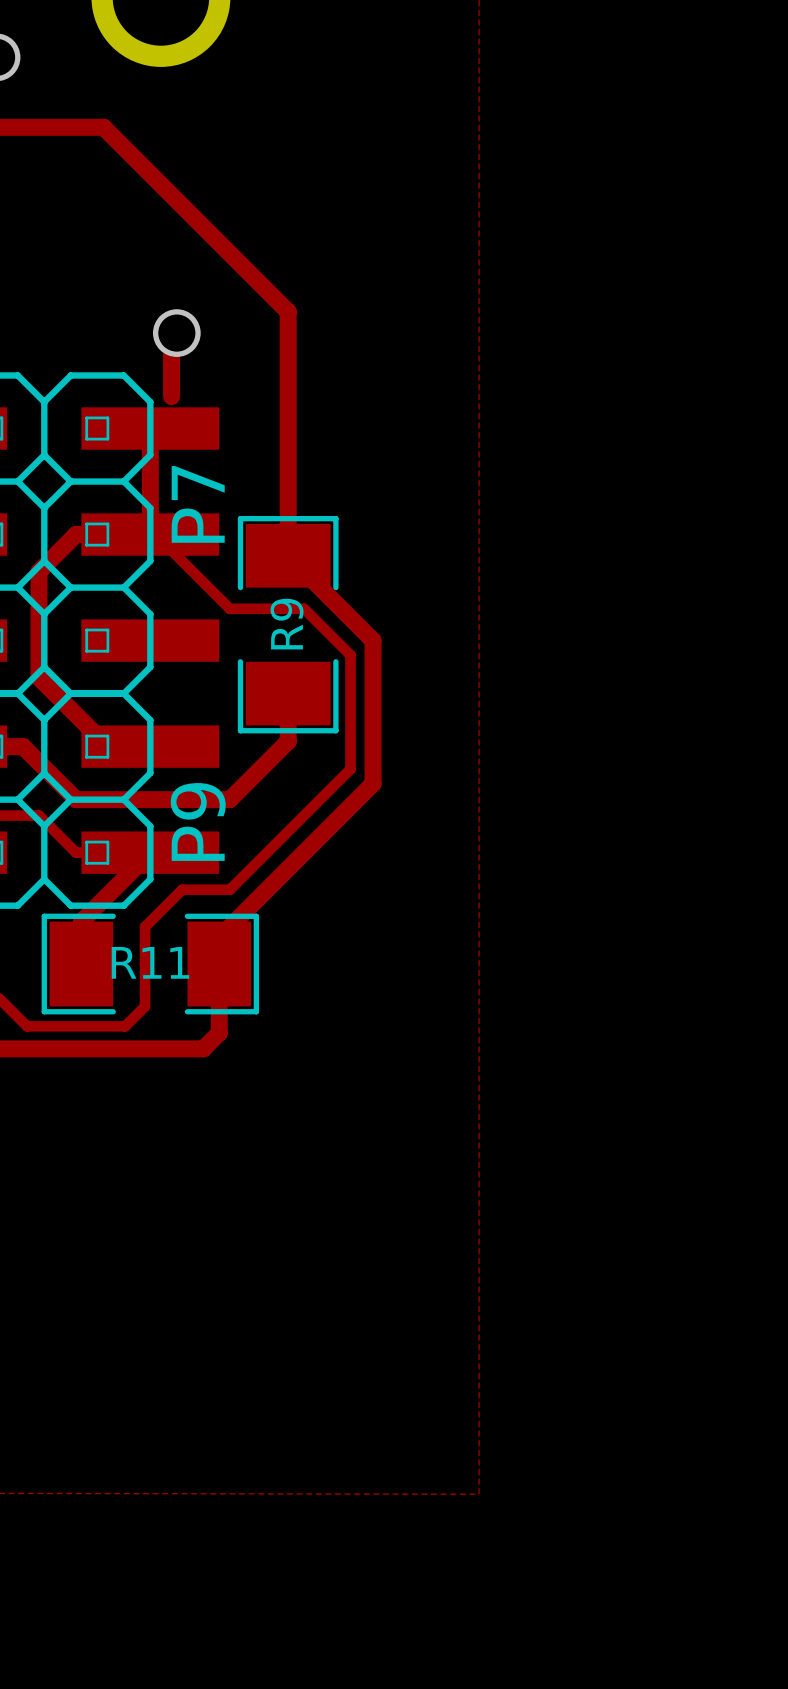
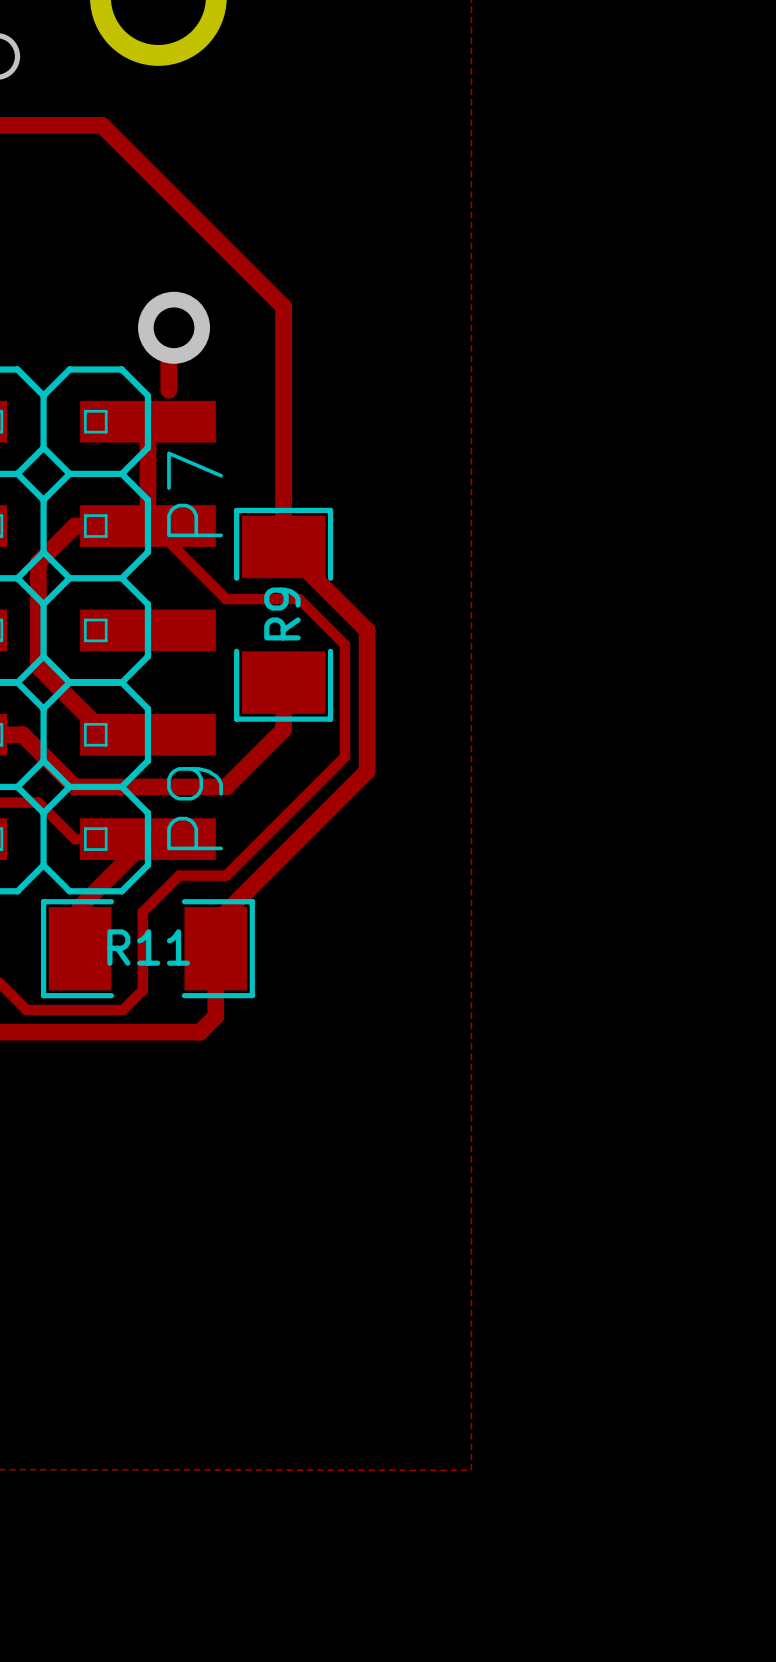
via size: [152, 309, 201, 357] -> [138, 291, 211, 364]

